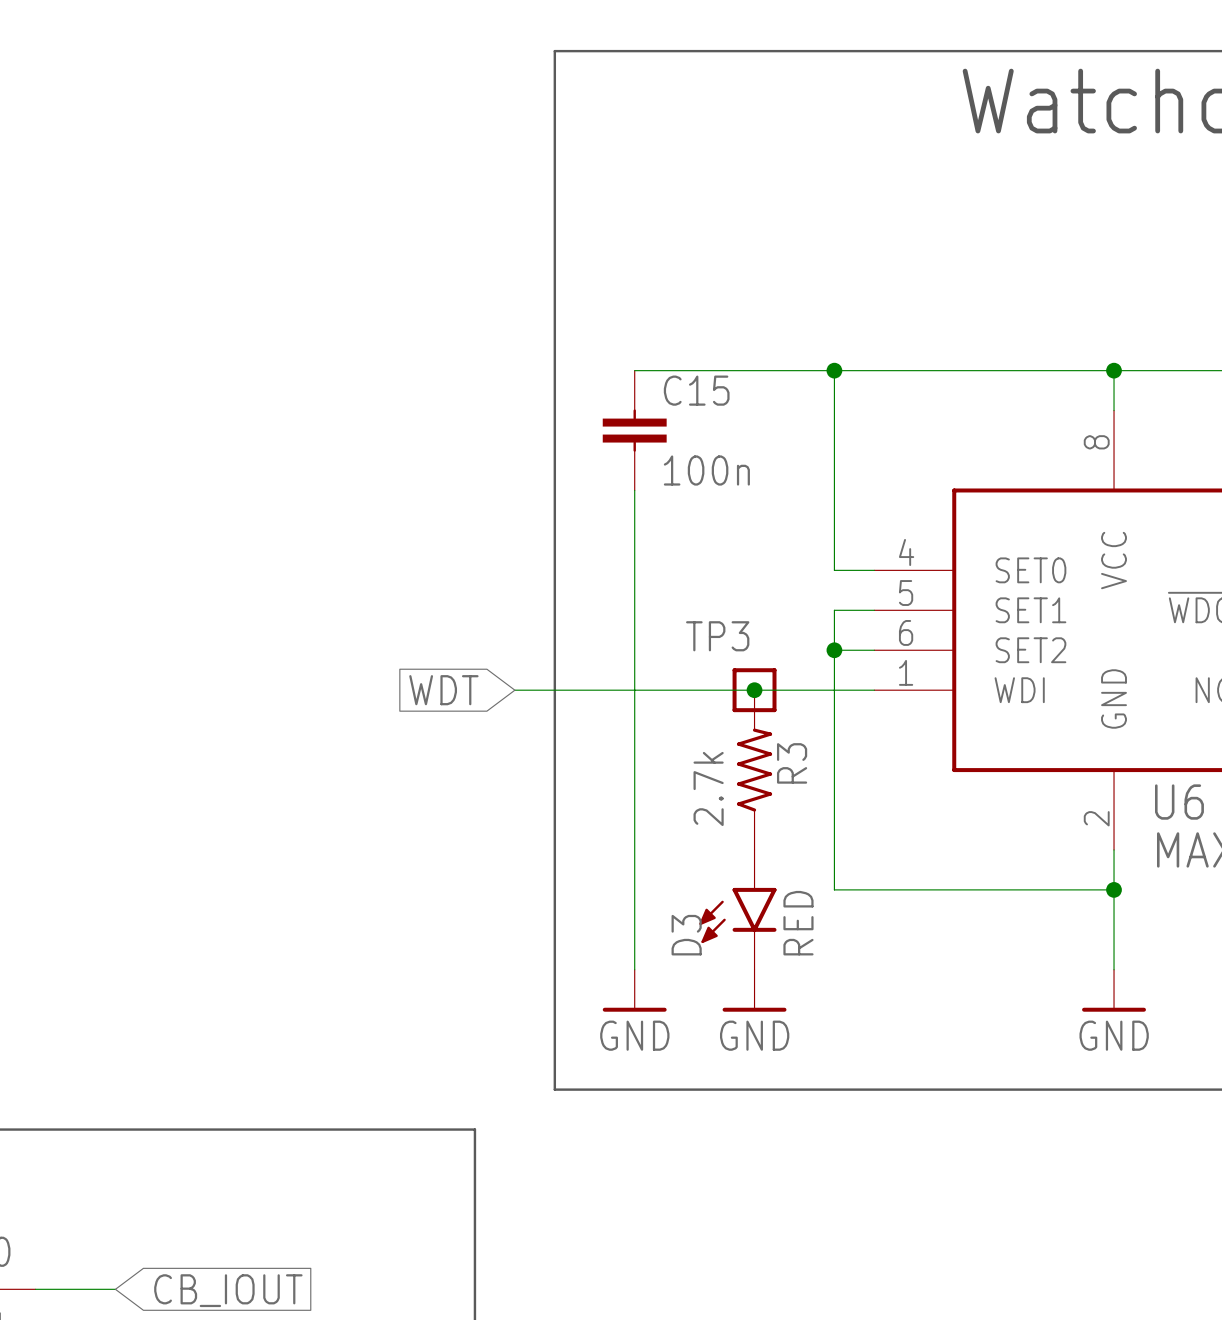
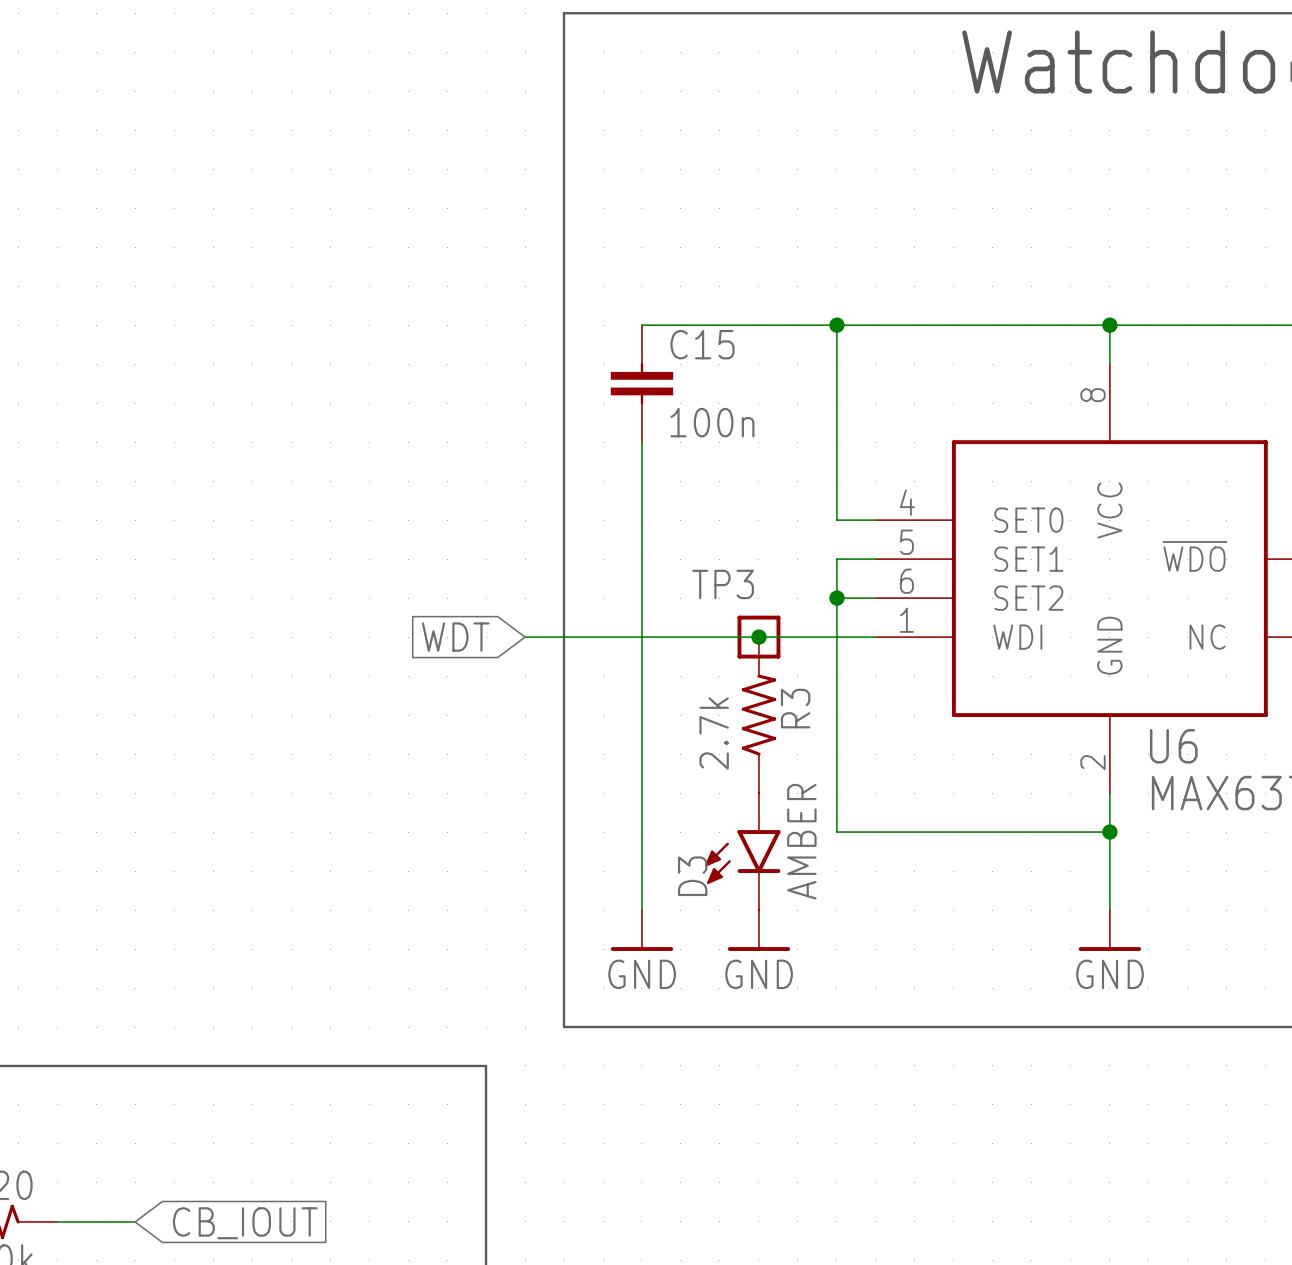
D3 value: RED (798, 923) -> AMBER (801, 841)

